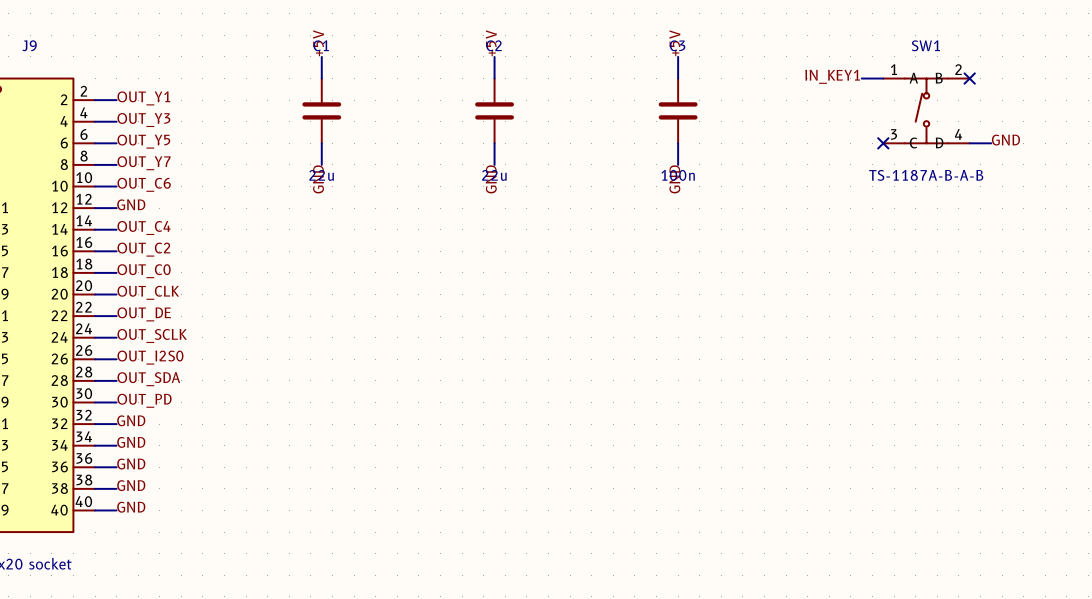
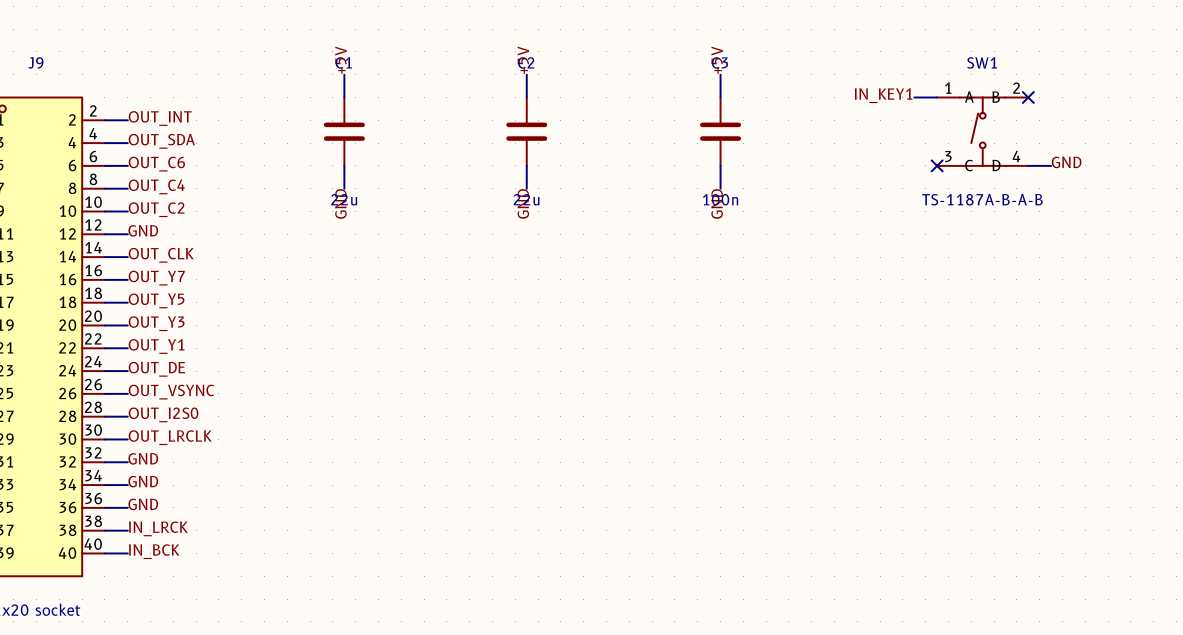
label: OUT_Y1 (143, 98) -> OUT_INT (160, 118)
label: OUT_Y3 (143, 120) -> OUT_SDA (161, 141)
label: OUT_Y5 (143, 141) -> OUT_C6 (156, 164)
label: OUT_Y7 (144, 163) -> OUT_C4 (156, 186)
label: OUT_C6 (144, 184) -> OUT_C2 (156, 209)
label: OUT_C4 (144, 228) -> OUT_CLK (161, 255)
label: OUT_C2 (143, 249) -> OUT_Y7 (156, 278)
label: OUT_C0 (144, 271) -> OUT_Y5 (156, 300)
label: OUT_CLK (148, 292) -> OUT_Y3 (156, 323)
label: OUT_DE (144, 314) -> OUT_Y1 (156, 346)
label: OUT_SCLK (152, 335) -> OUT_DE (156, 369)
label: OUT_I2S0 (150, 357) -> OUT_VSYNC (171, 392)
label: OUT_SDA (148, 379) -> OUT_I2S0 (163, 414)
label: OUT_PD (144, 400) -> OUT_LRCLK (170, 437)
label: GND (131, 485) -> IN_LRCK (158, 528)
label: GND (131, 507) -> IN_BCK (154, 551)

